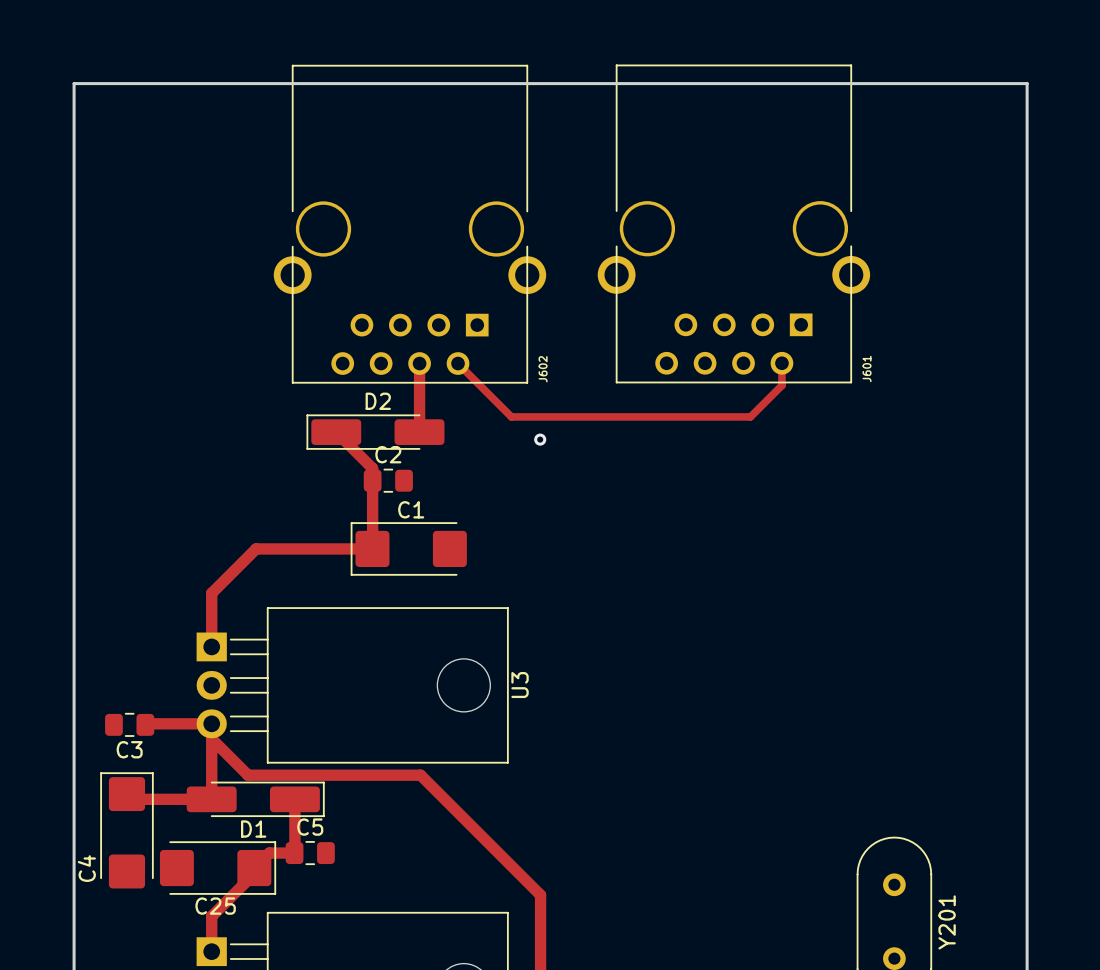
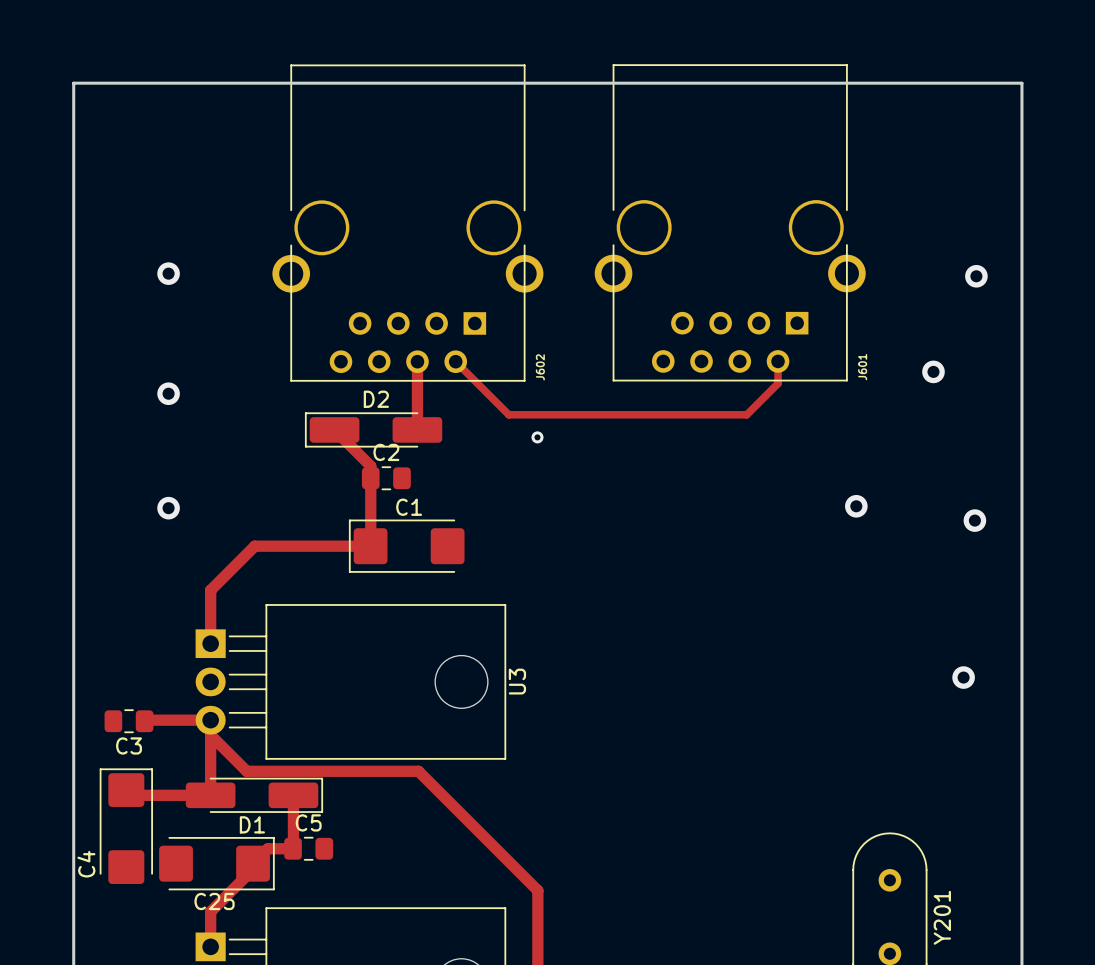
via: none -> (168, 273)
via: none -> (976, 276)
via: none -> (933, 371)
via: none -> (168, 393)
via: none -> (856, 506)
via: none -> (168, 508)
via: none -> (974, 520)
via: none -> (963, 677)

